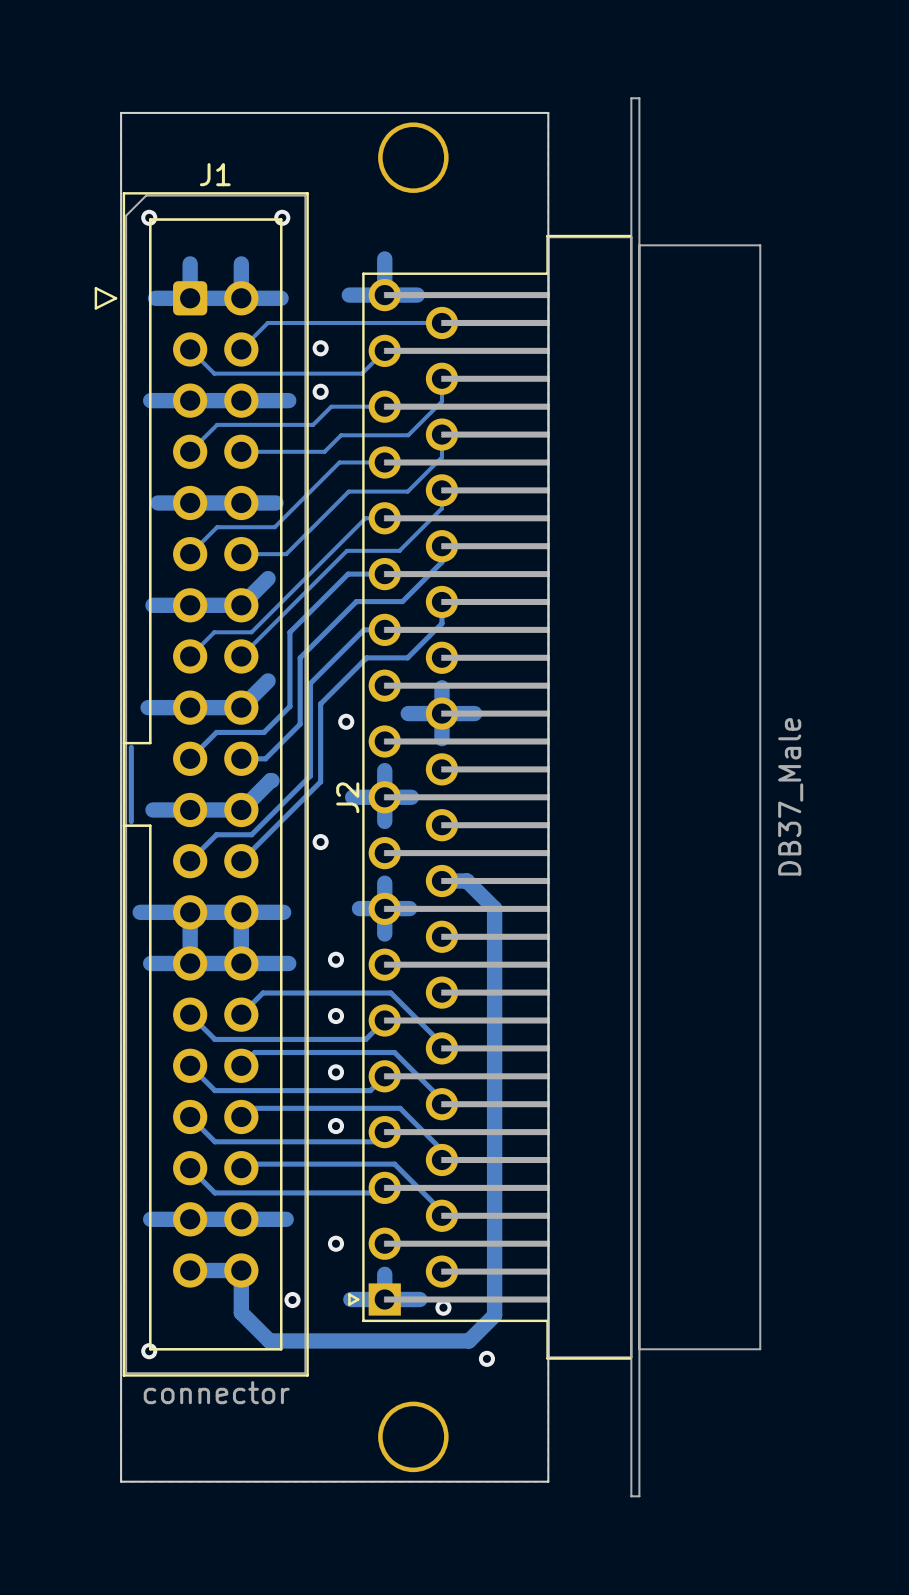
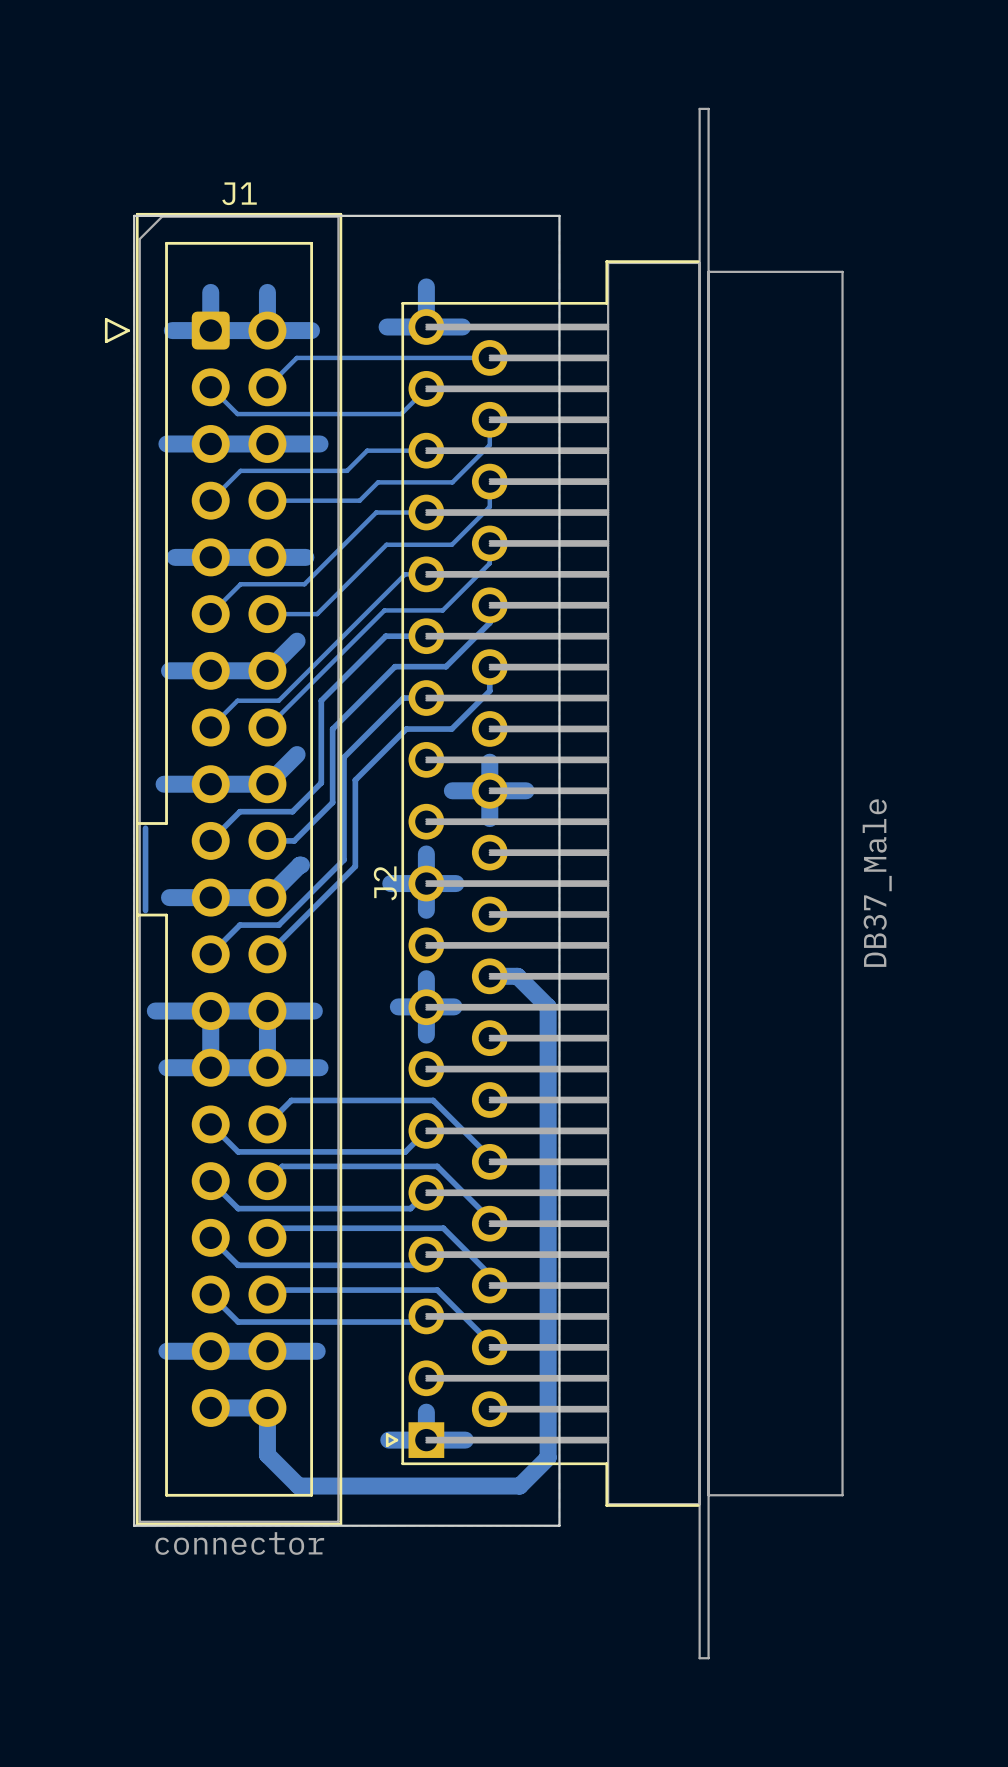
J2 footprint: [348, 97, 762, 1498] -> [385, 107, 844, 1660]
board edge: (121, 194) (121, 112) (548, 112) (548, 1481) (121, 1481) (121, 1376) -> (134, 215) (559, 215) (559, 1525) (134, 1525)
via: (149, 217) -> none
via: (282, 217) -> none
via: (320, 348) -> none
via: (320, 391) -> none
via: (346, 721) -> none
via: (320, 842) -> none
via: (335, 959) -> none
via: (335, 1016) -> none
via: (335, 1072) -> none
via: (335, 1126) -> none
via: (335, 1243) -> none
via: (292, 1300) -> none
via: (443, 1307) -> none
via: (149, 1351) -> none
via: (486, 1358) -> none

